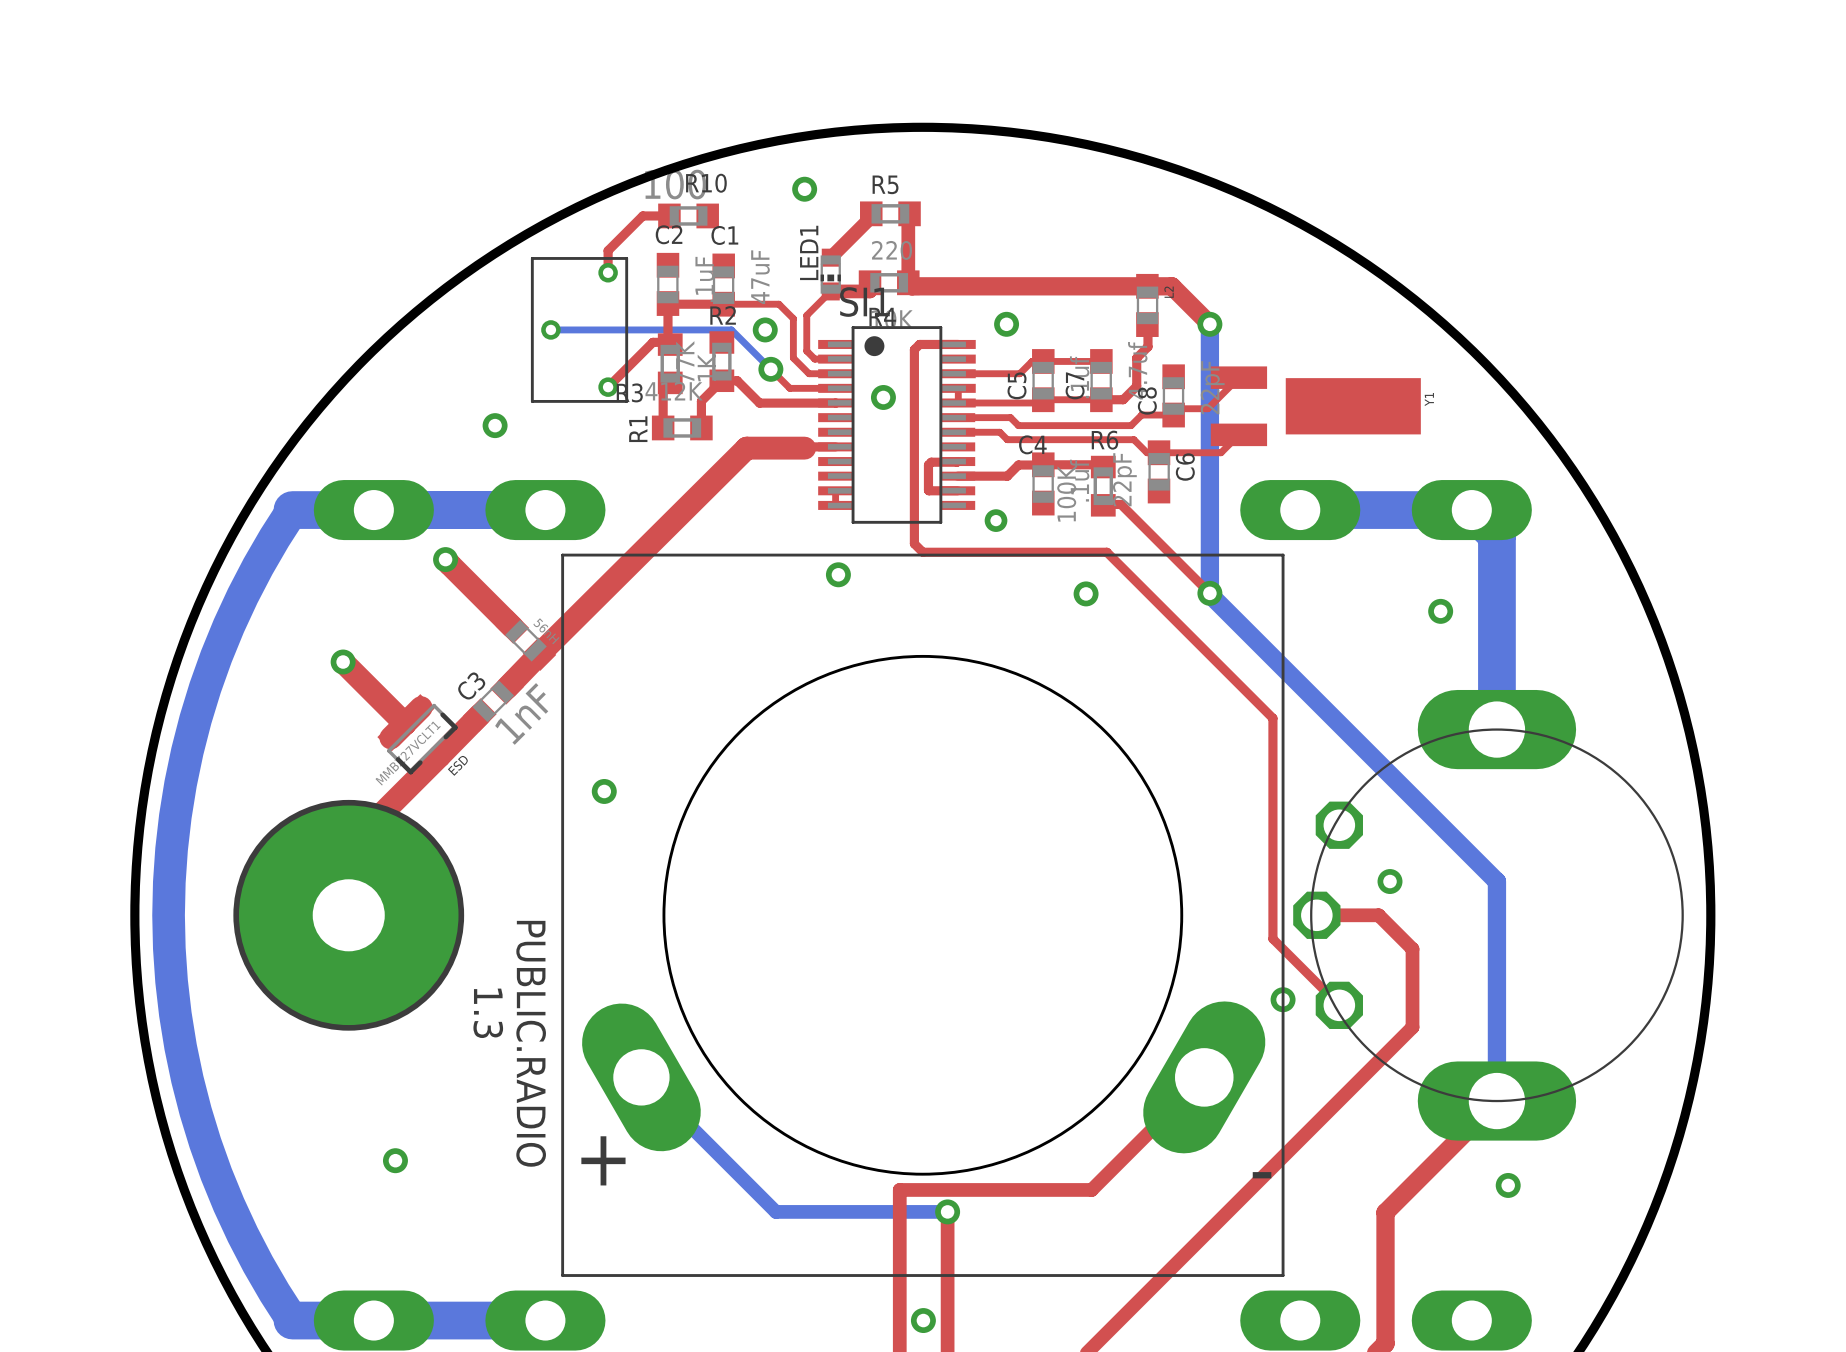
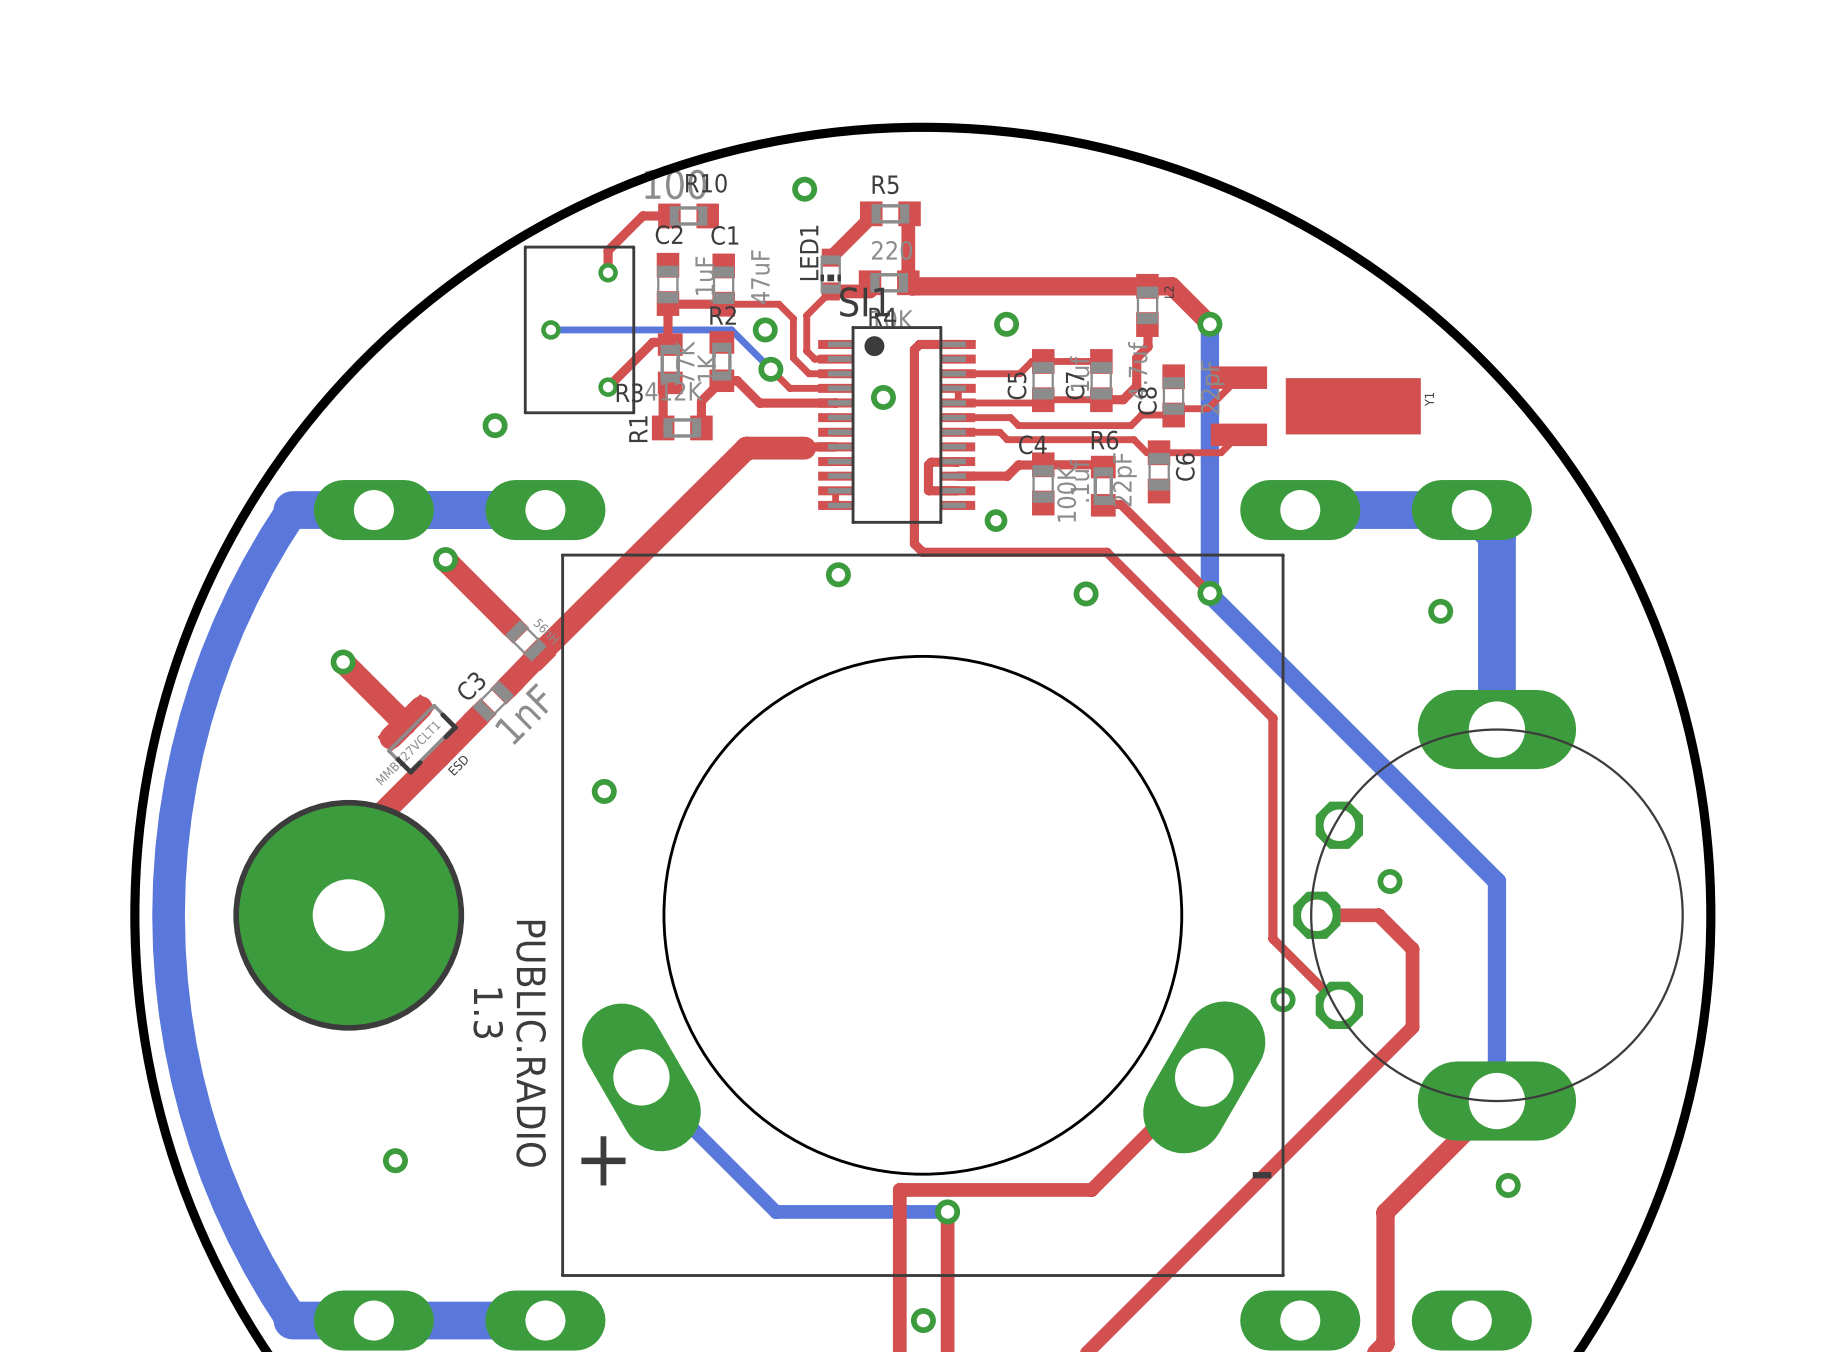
part footprint: [530, 257, 629, 403] -> [523, 245, 636, 415]

